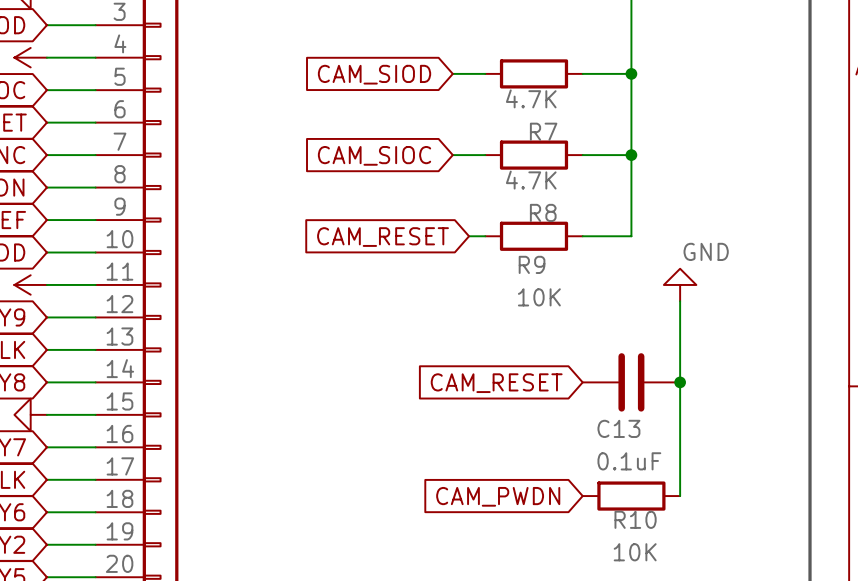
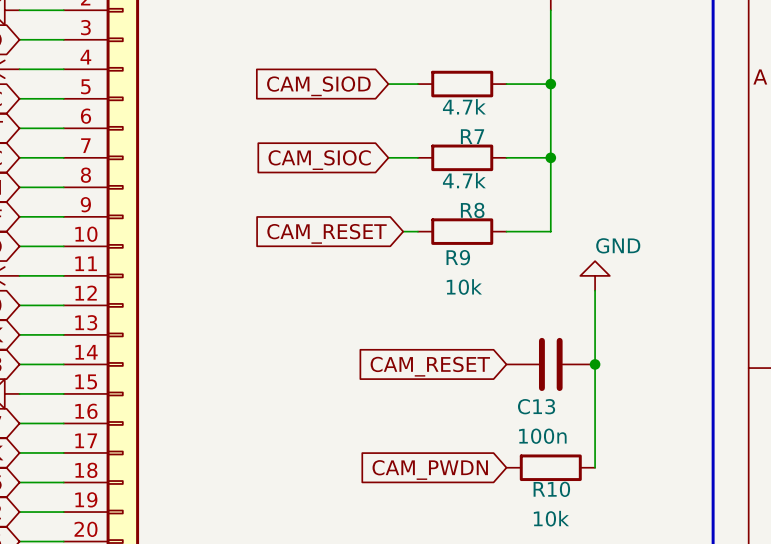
R7 value: 4.7K (531, 98) -> 4.7k (464, 106)
R8 value: 4.7K (531, 180) -> 4.7k (464, 180)
R9 value: 10K (539, 297) -> 10k (464, 286)
C13 value: 0.1uF (629, 461) -> 100n (542, 436)
R10 value: 10K (635, 552) -> 10k (551, 518)

